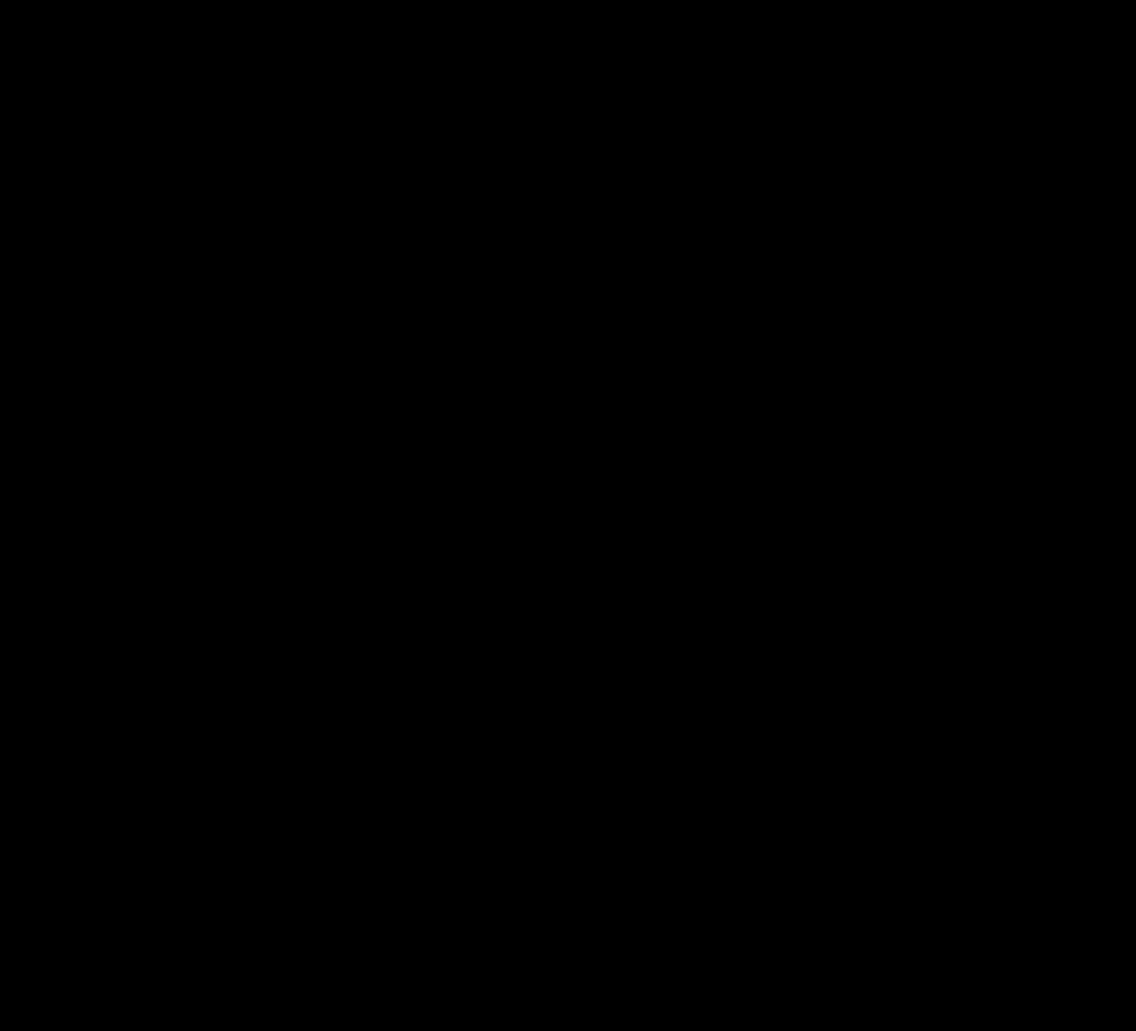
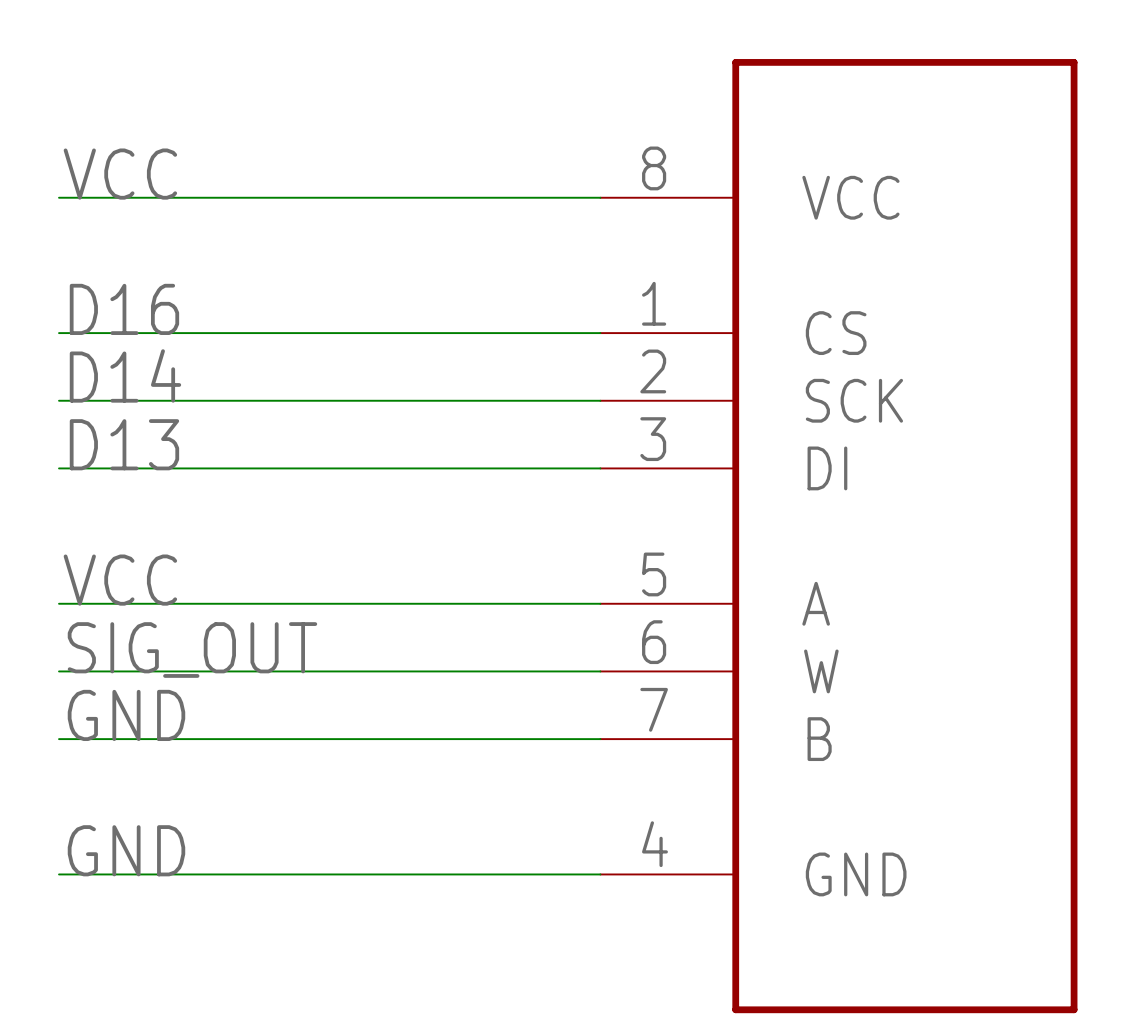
label: none -> VCC (120, 174)
wire: none -> (59, 197) (600, 197)
label: none -> D16 (124, 309)
wire: none -> (59, 333) (600, 333)
label: none -> D14 (125, 375)
wire: none -> (59, 400) (600, 400)
label: none -> D13 (124, 444)
wire: none -> (59, 468) (600, 468)
part: none -> (838, 536)
label: none -> VCC (120, 580)
wire: none -> (59, 603) (600, 603)
label: none -> SIG_OUT (192, 650)
wire: none -> (59, 671) (600, 671)
label: none -> GND (126, 715)
wire: none -> (59, 739) (600, 739)
label: none -> GND (126, 850)
wire: none -> (59, 874) (600, 874)

